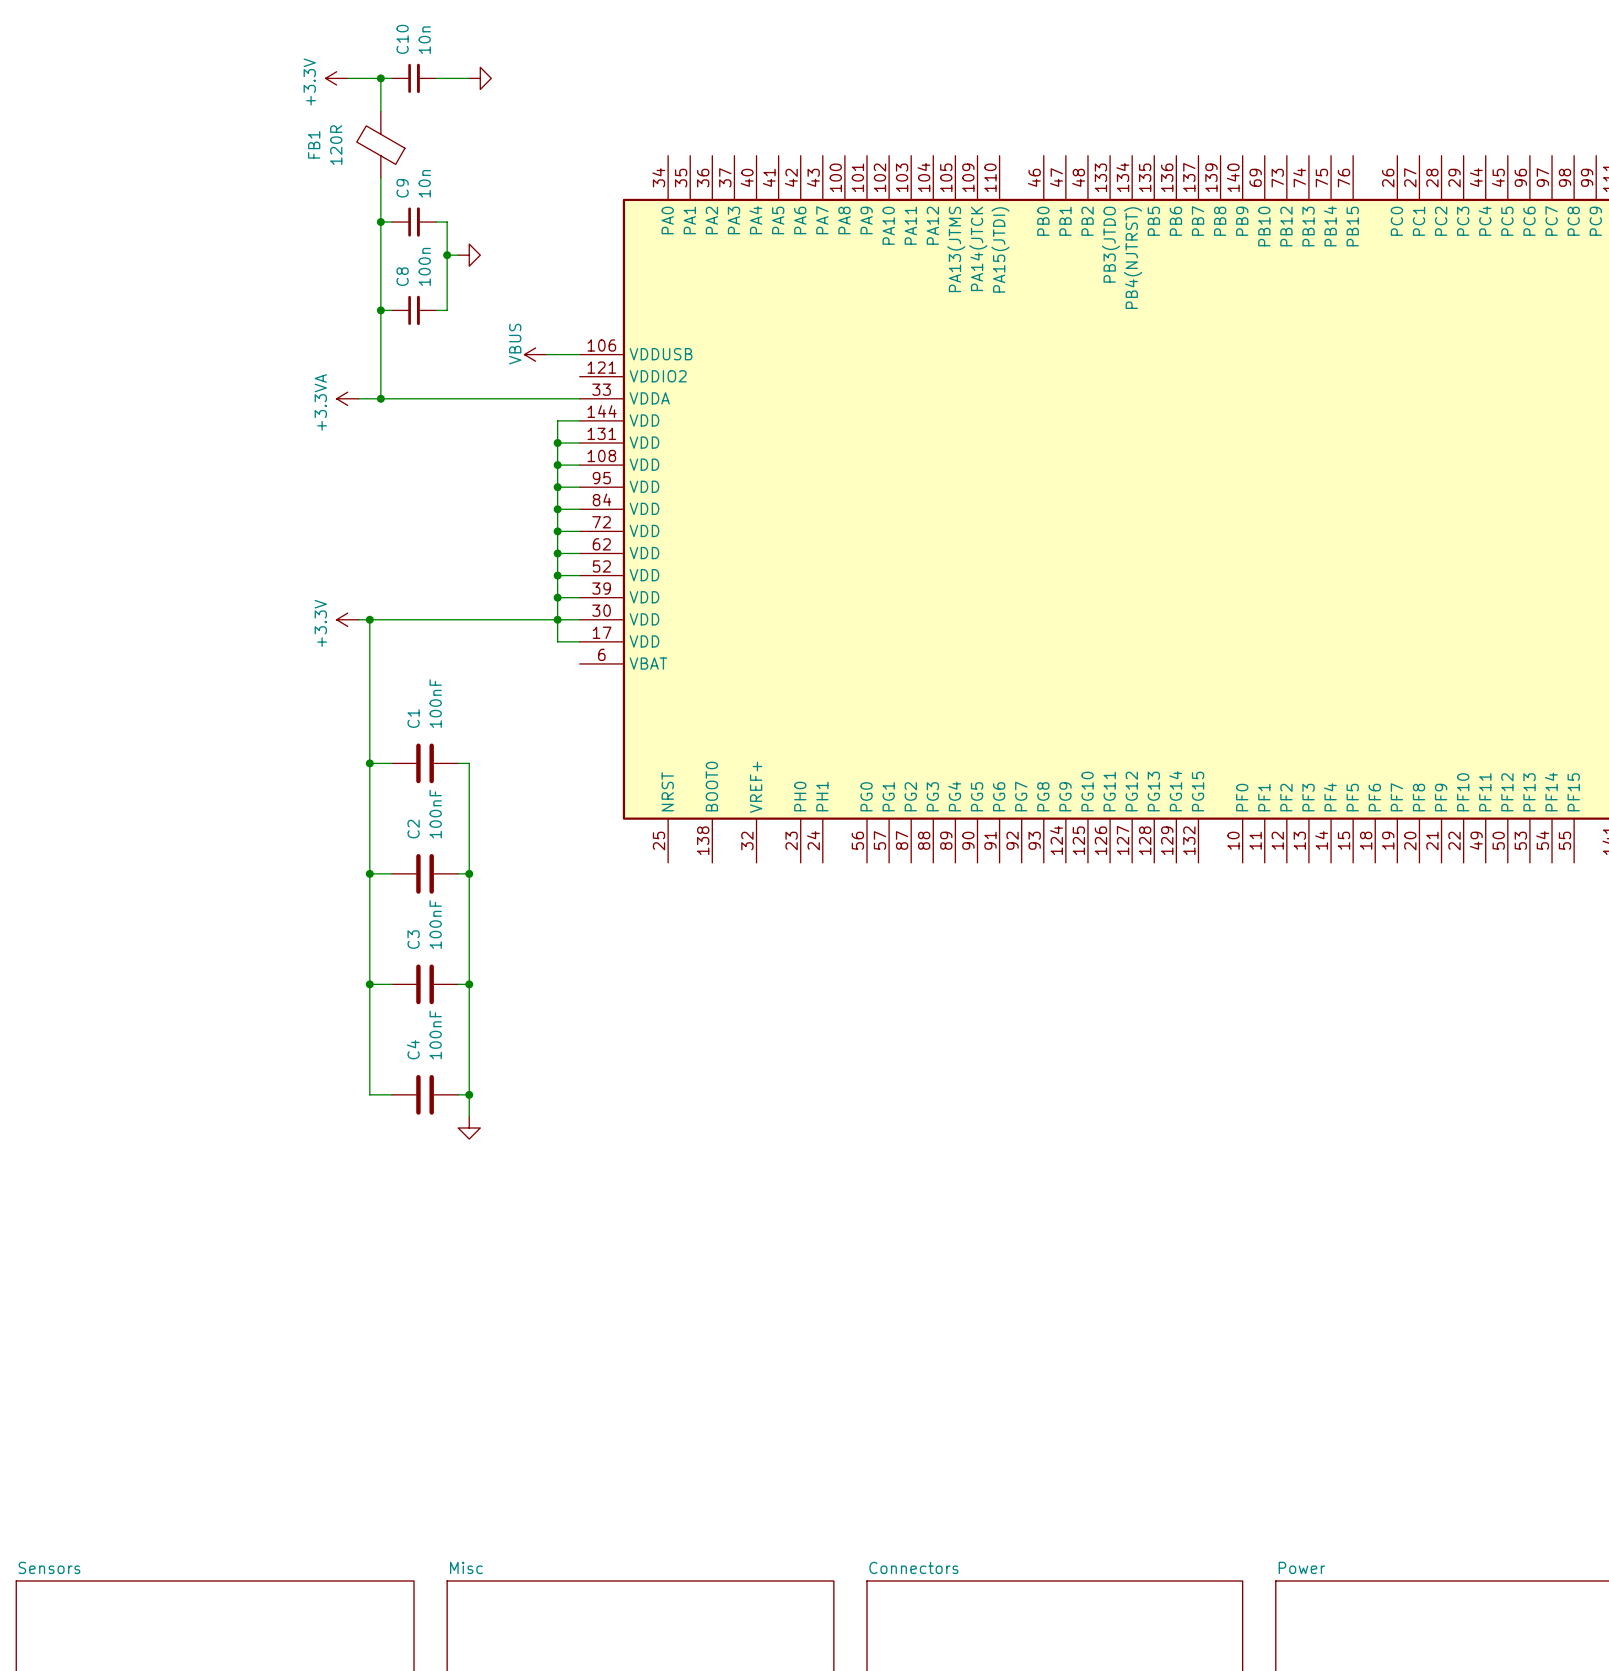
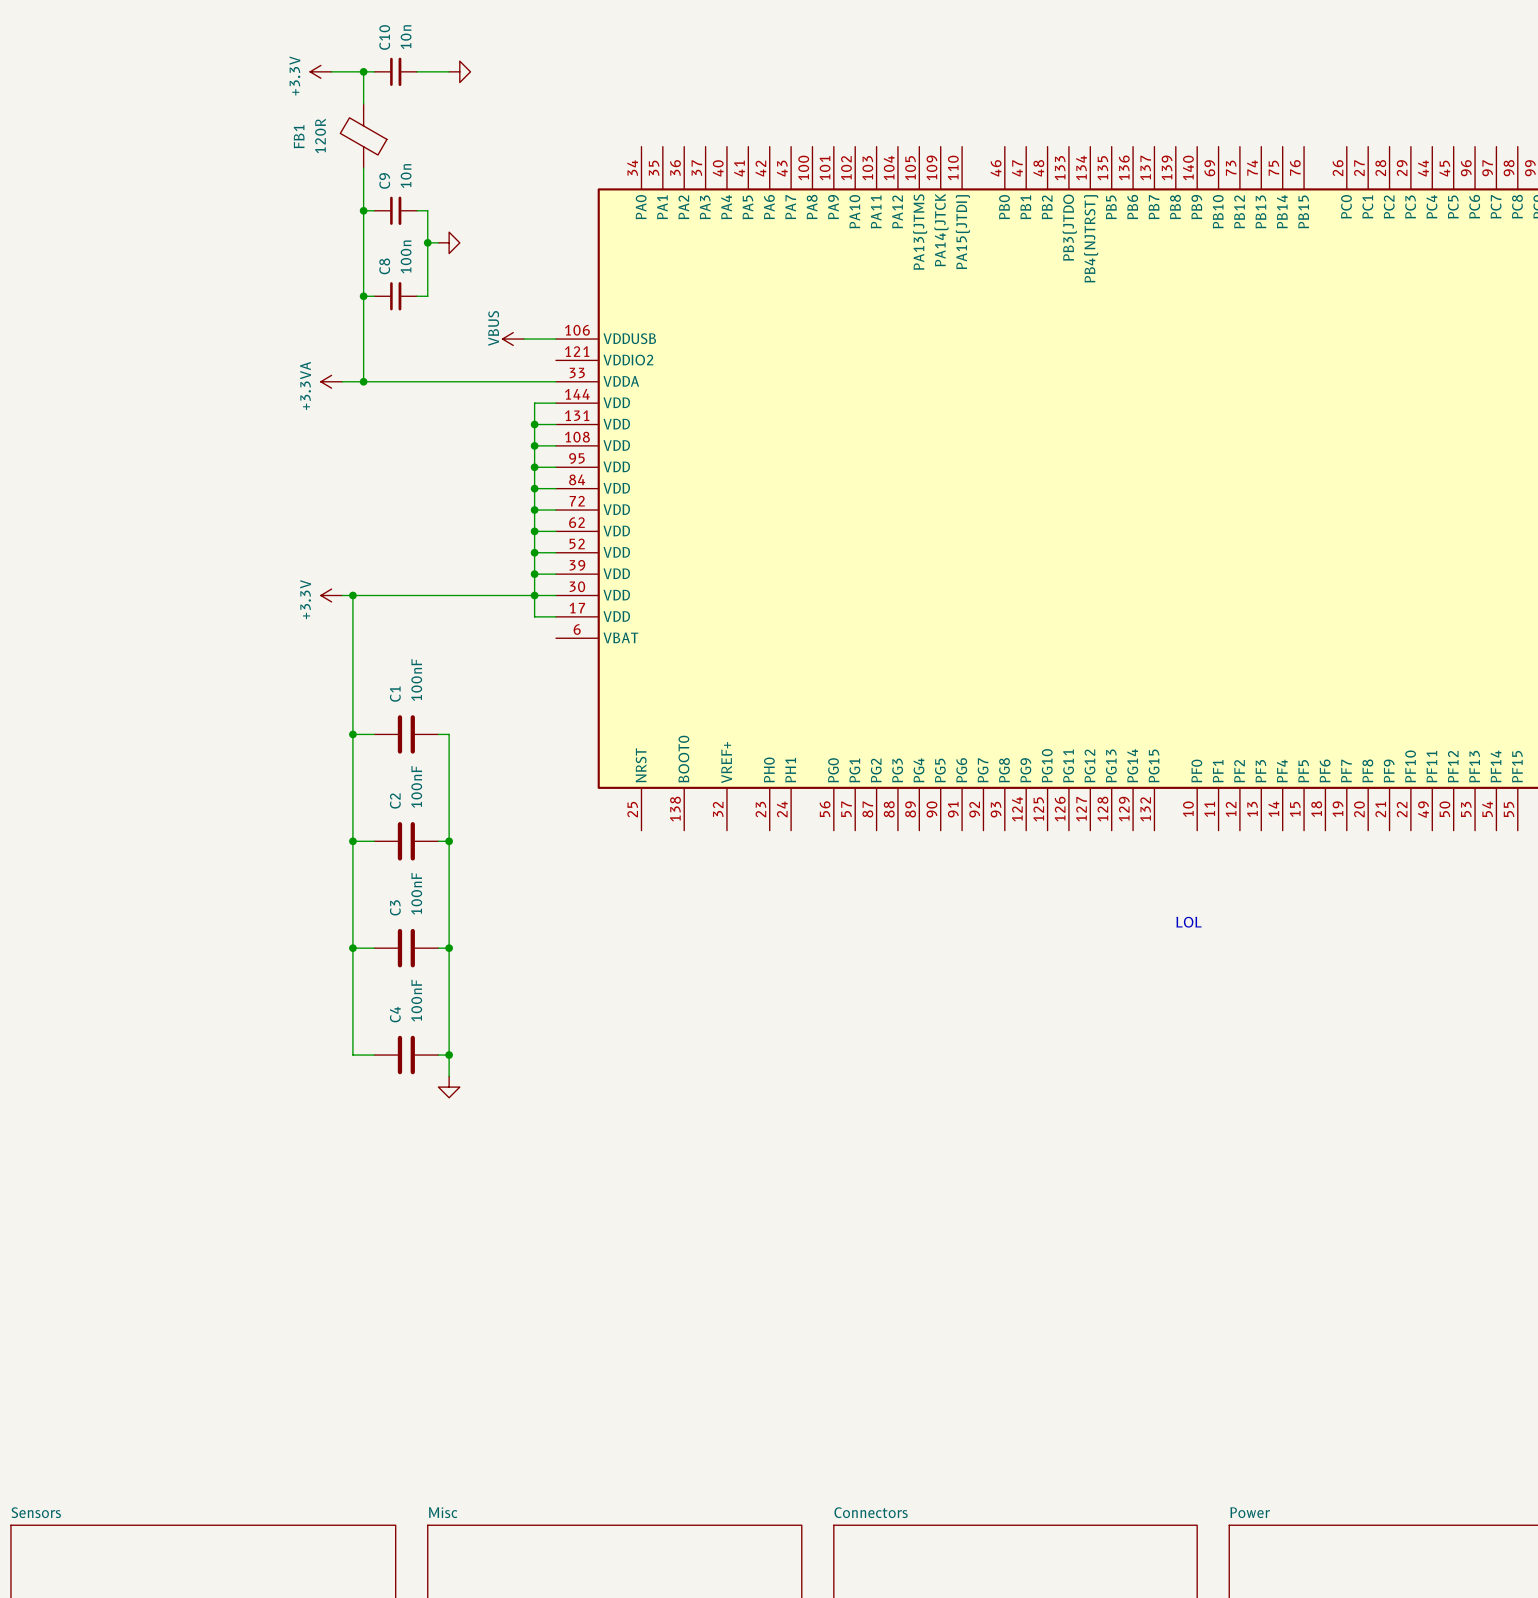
text: none -> LOL (1188, 922)

